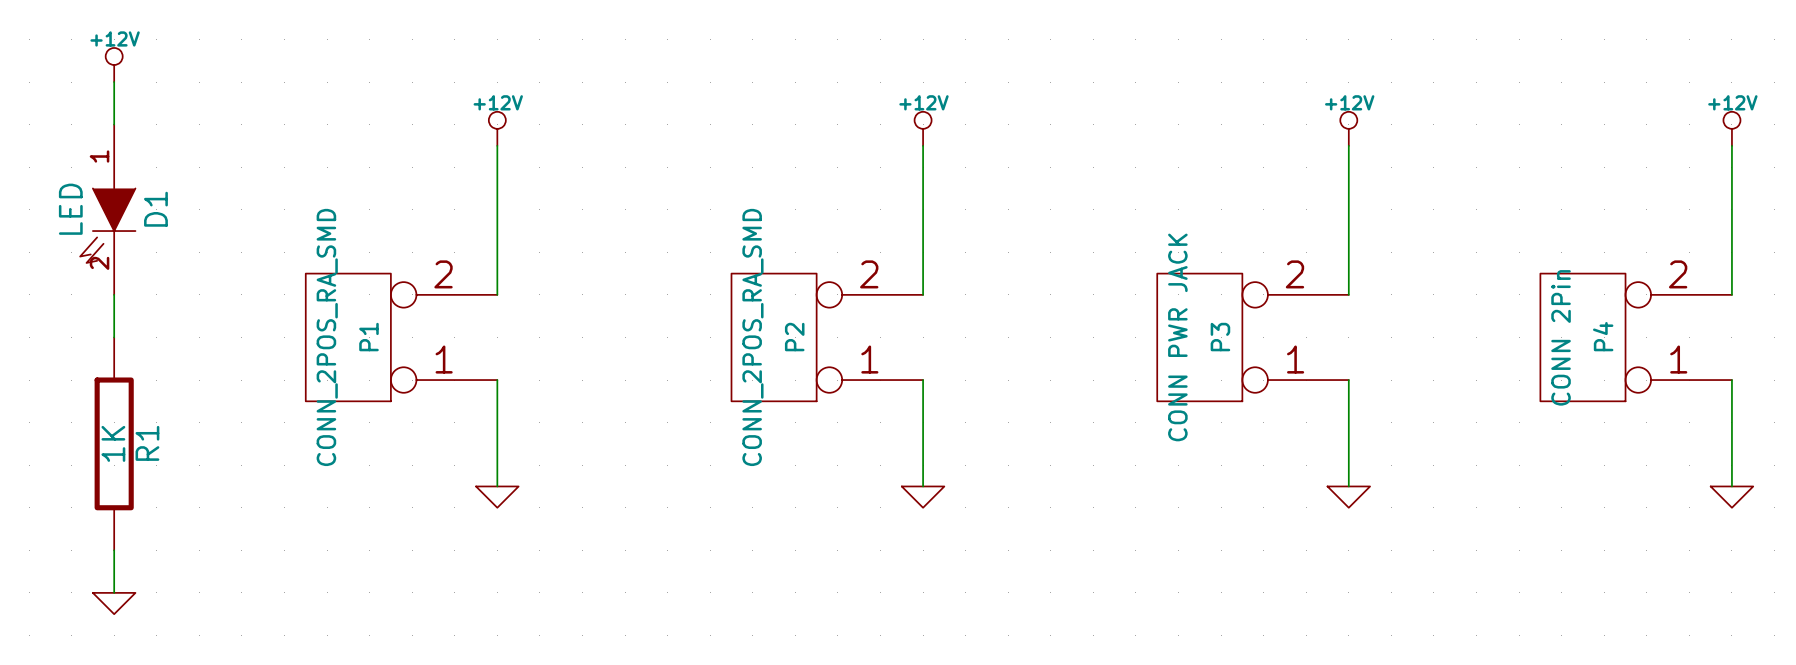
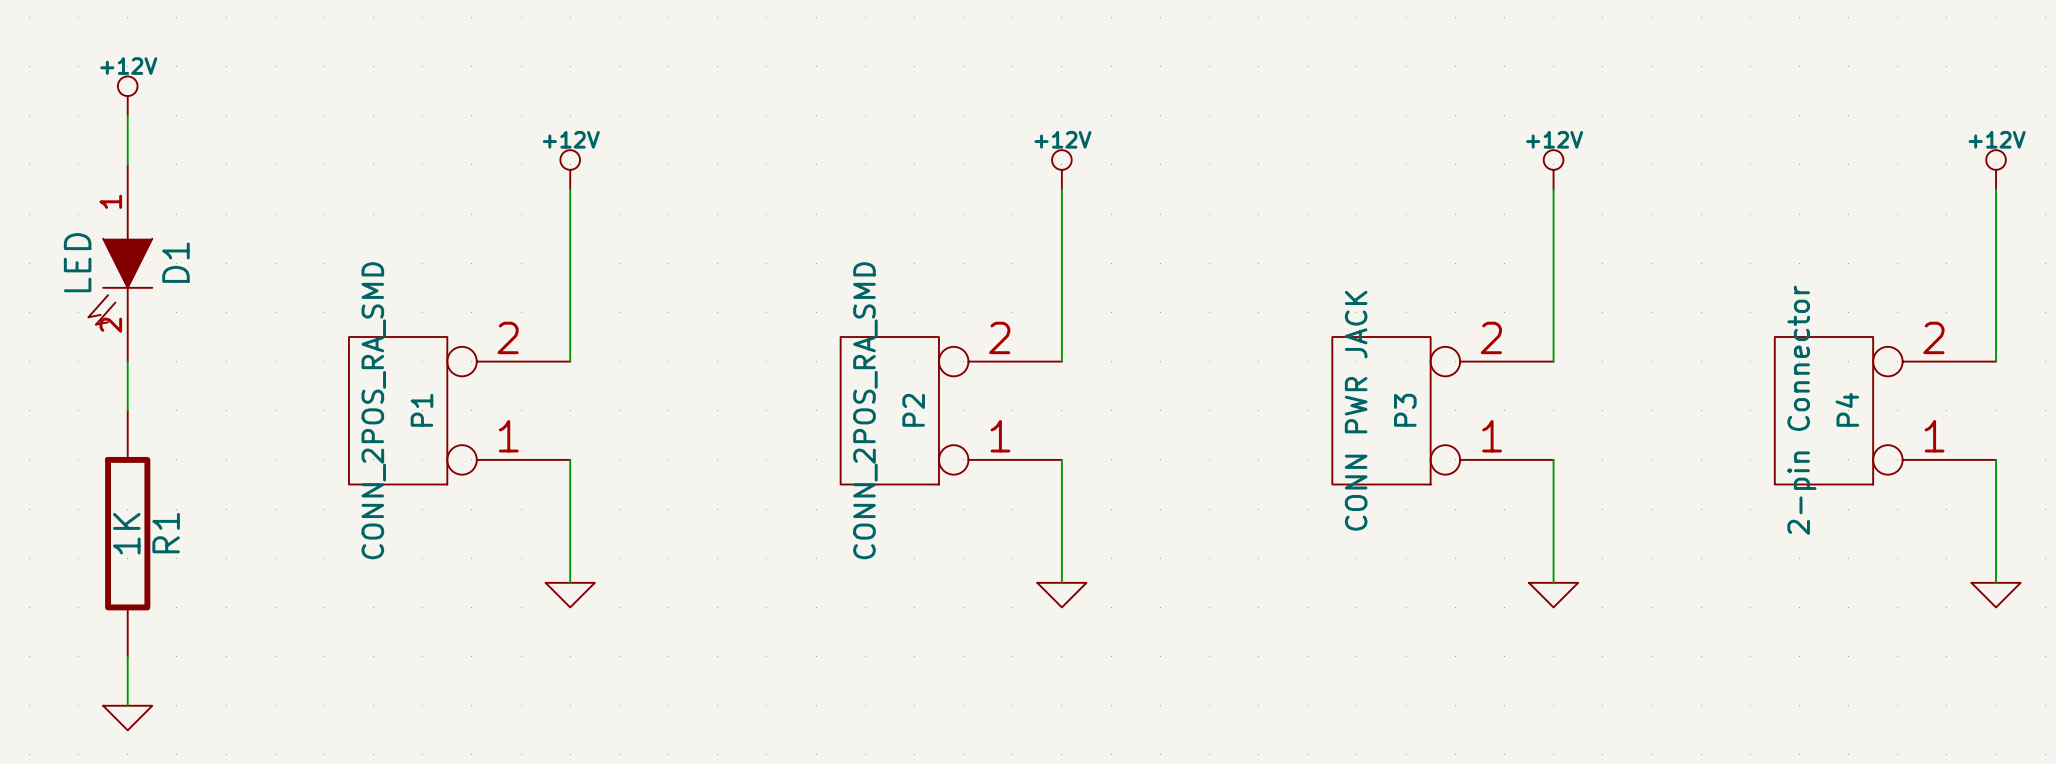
P4 value: CONN 2Pin (1561, 337) -> 2-pin Connector (1801, 410)

